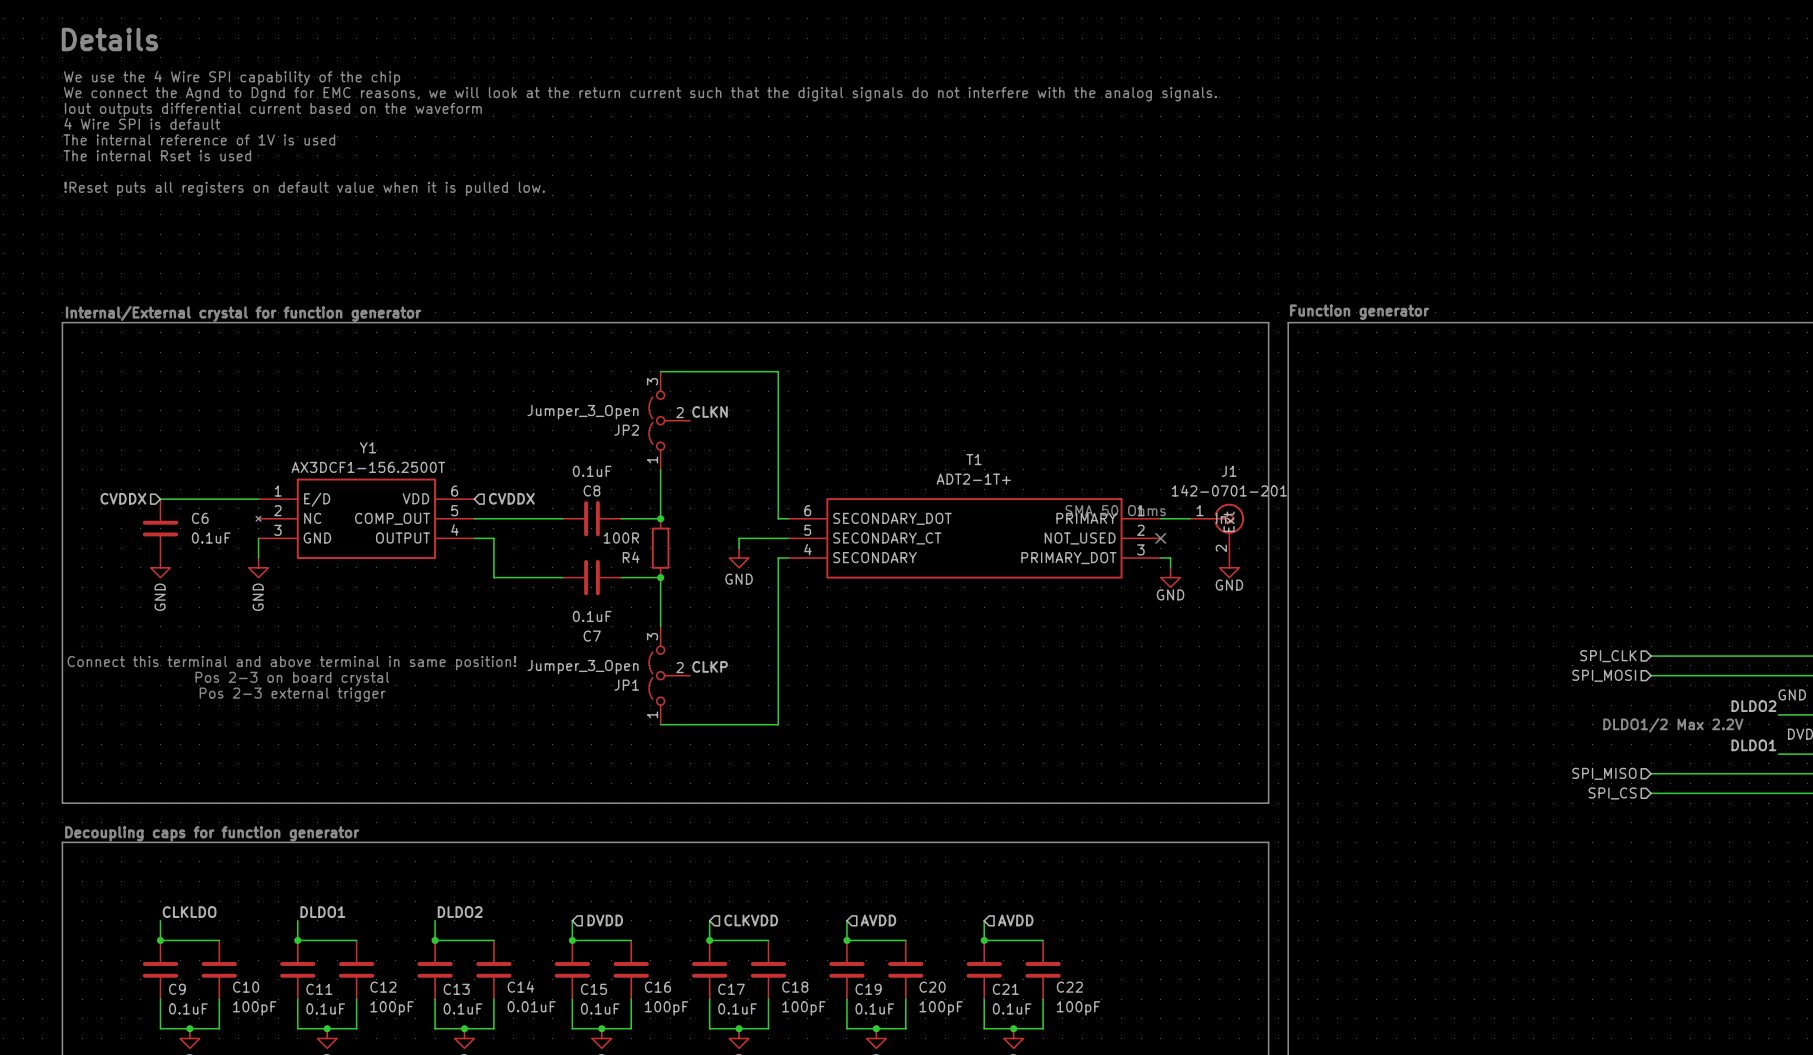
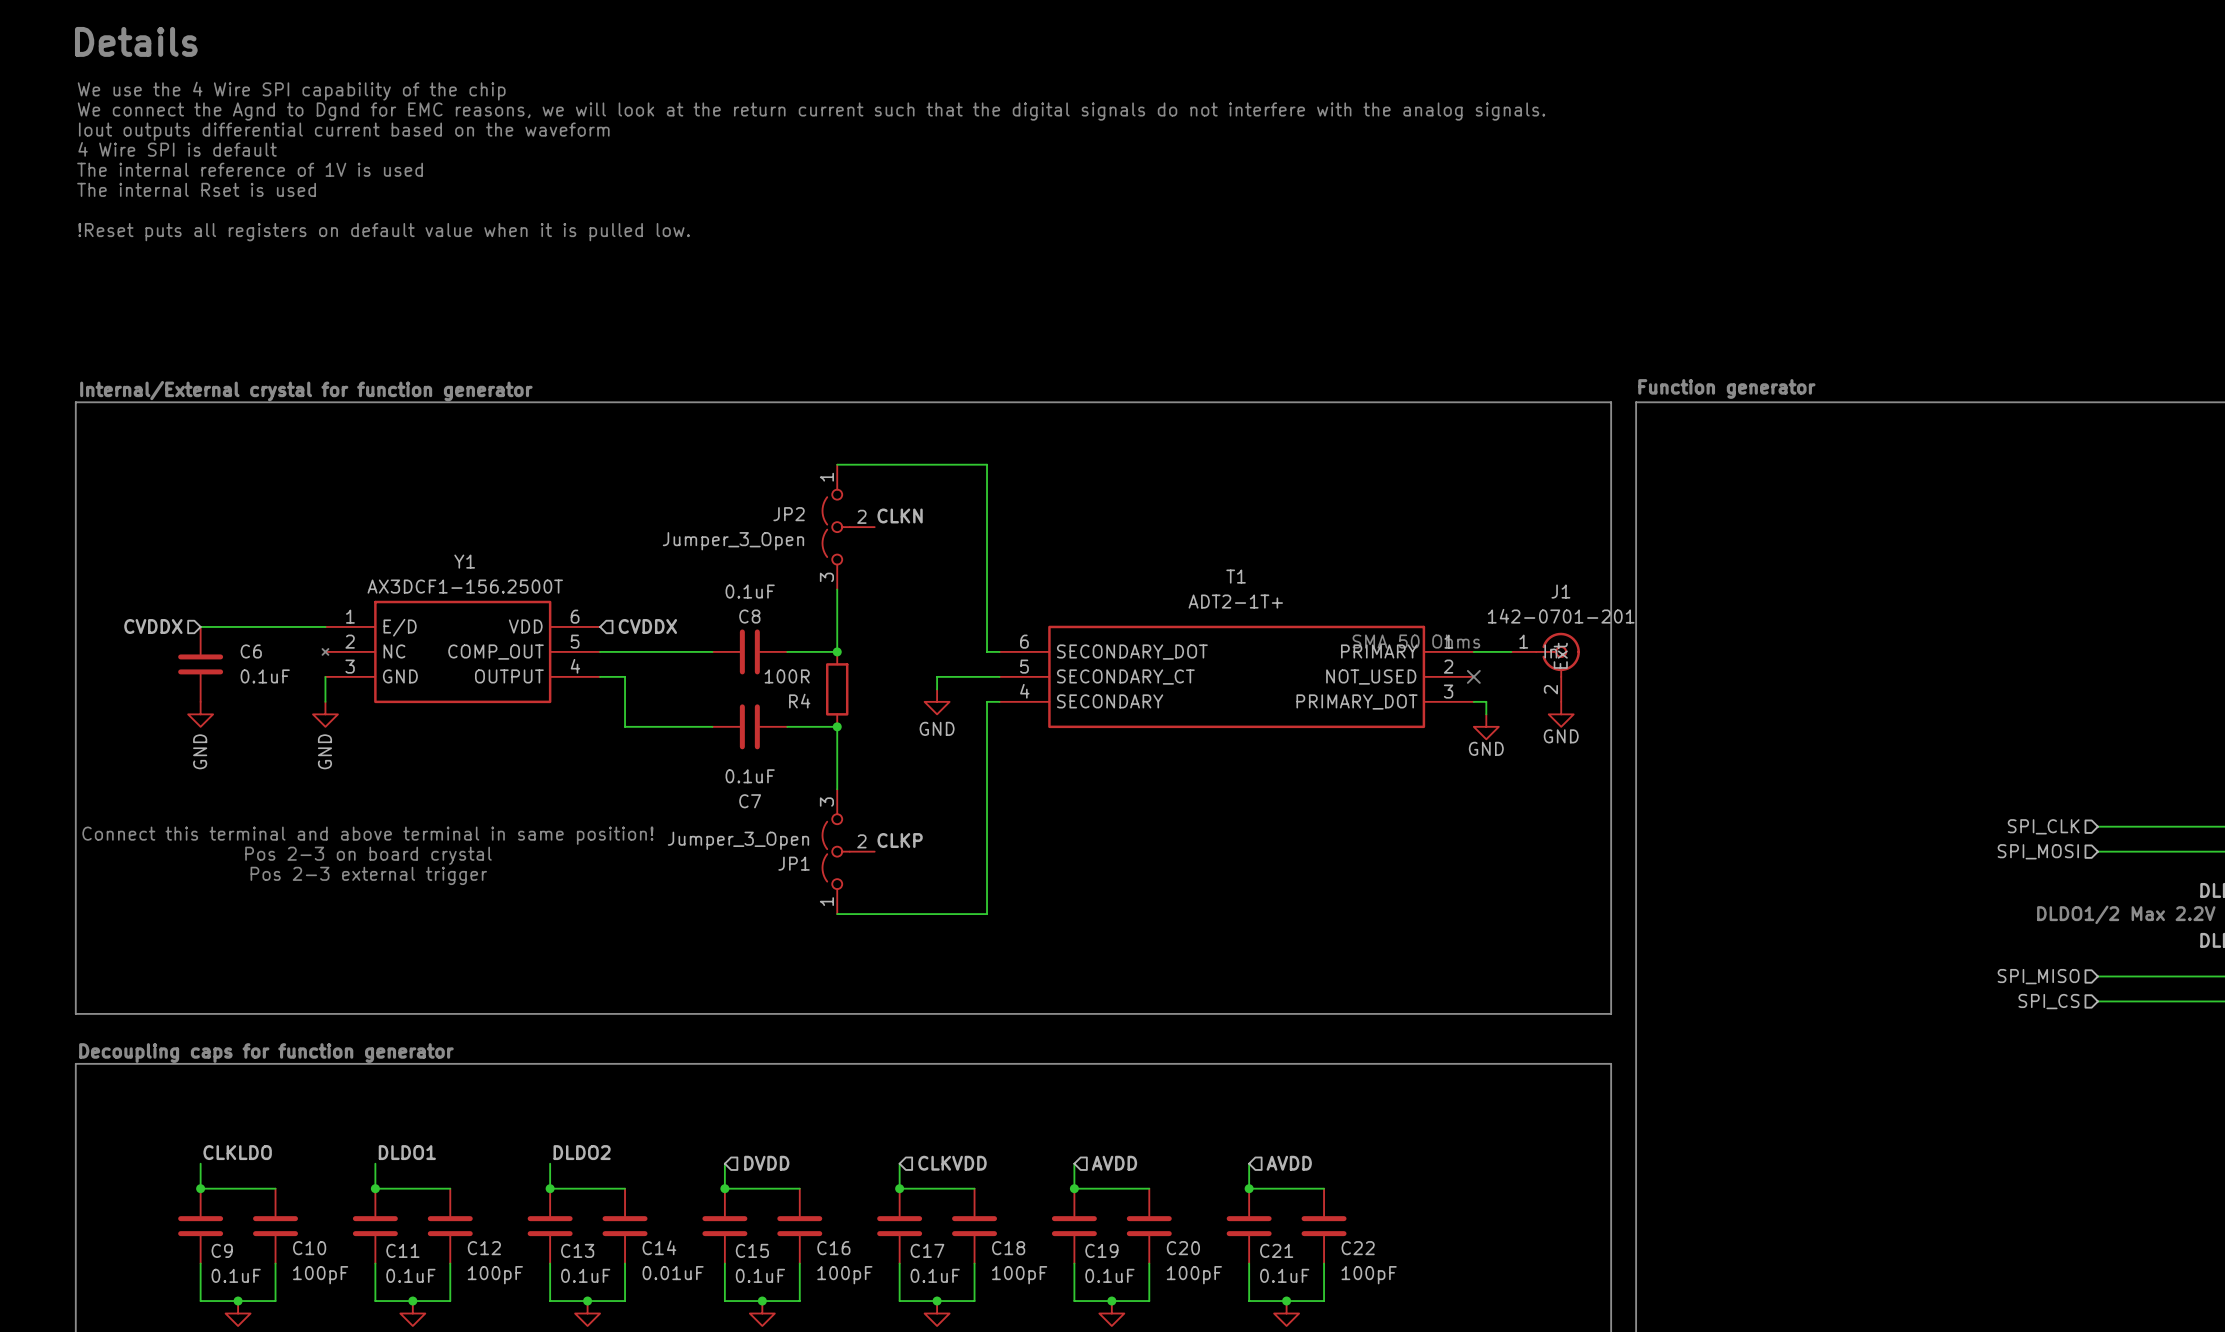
JP2 flip: as is (659, 420) -> up-down (836, 527)

